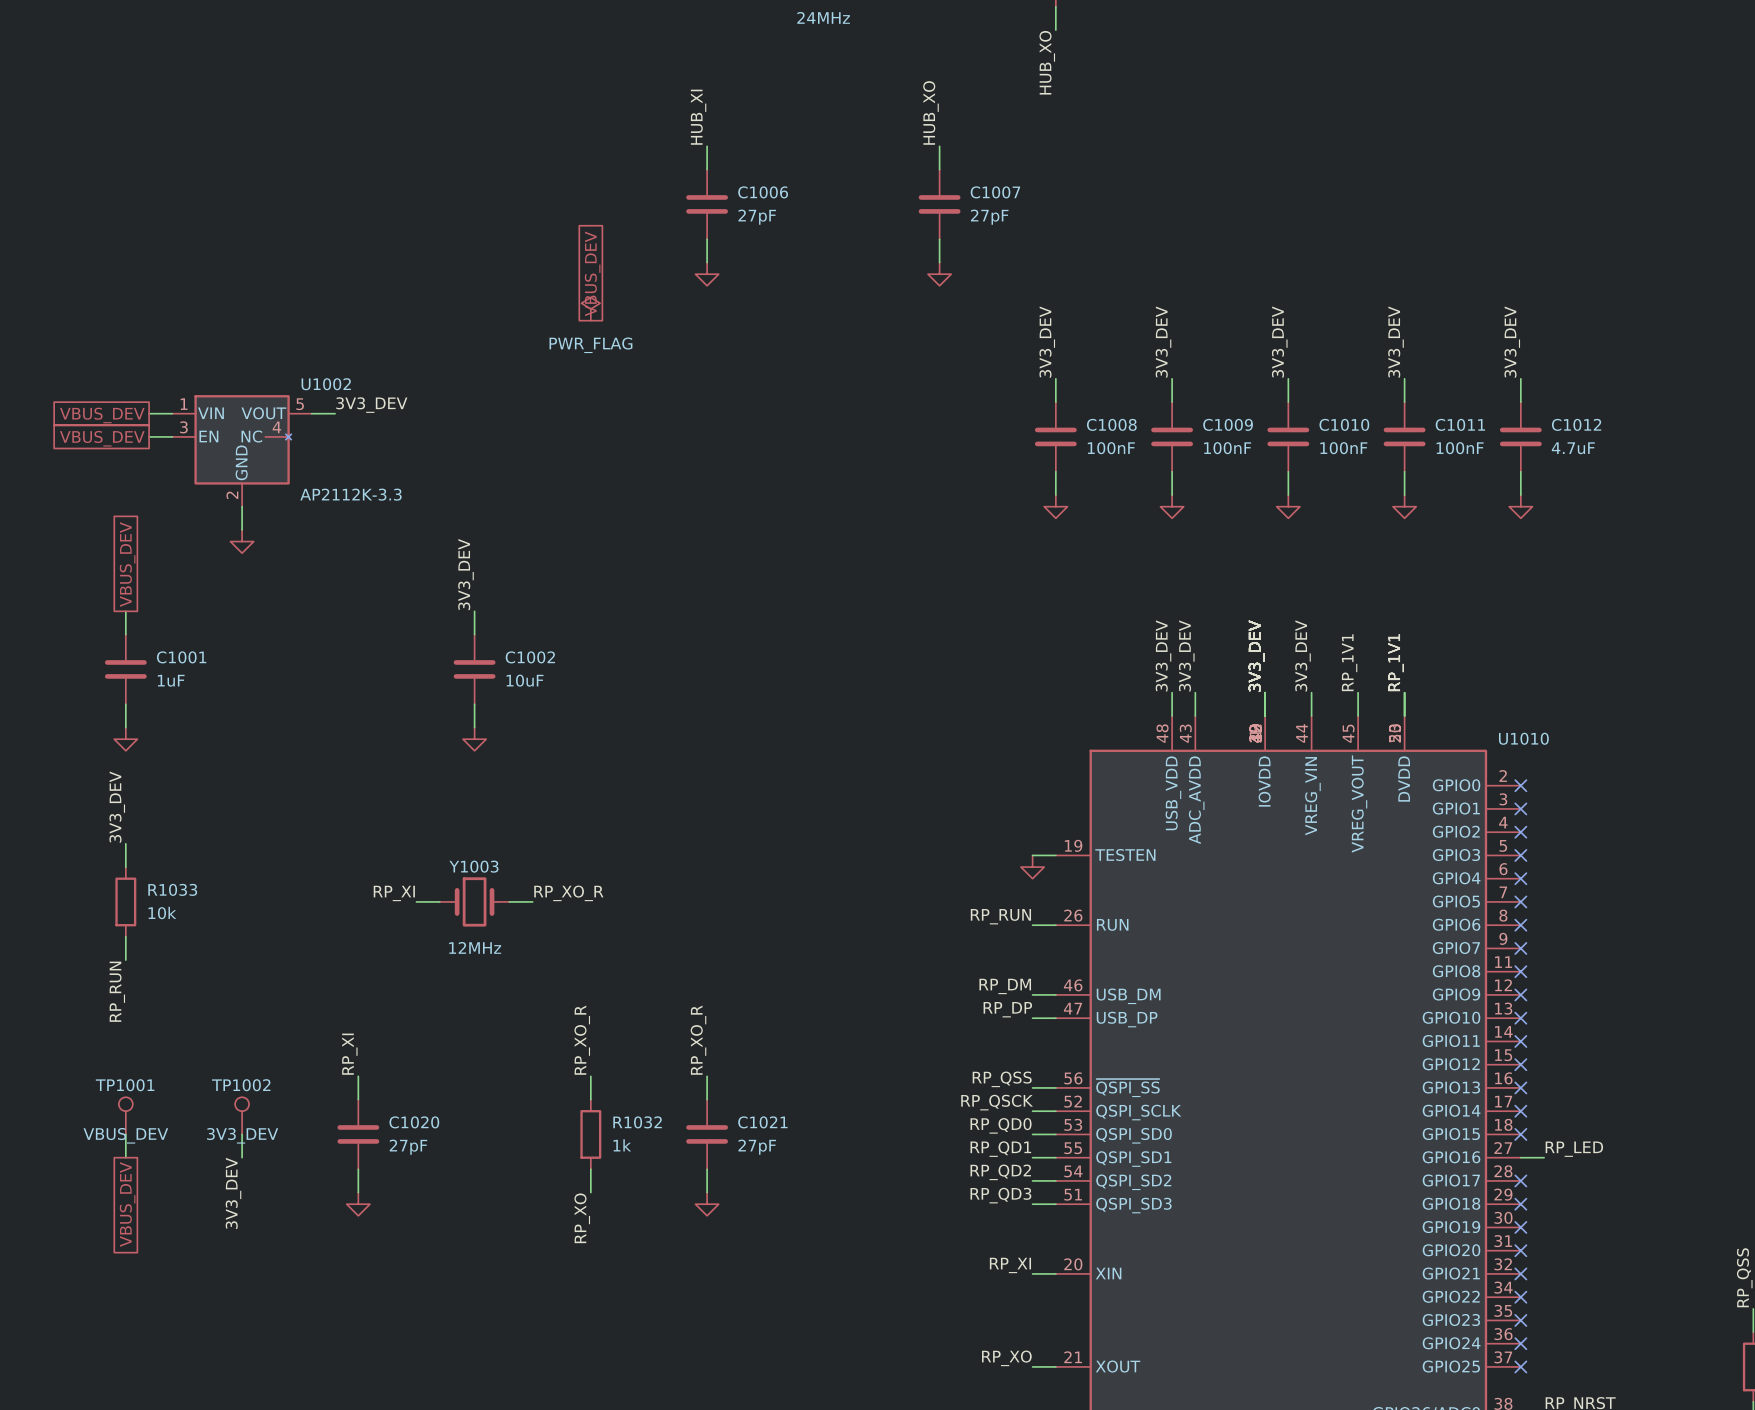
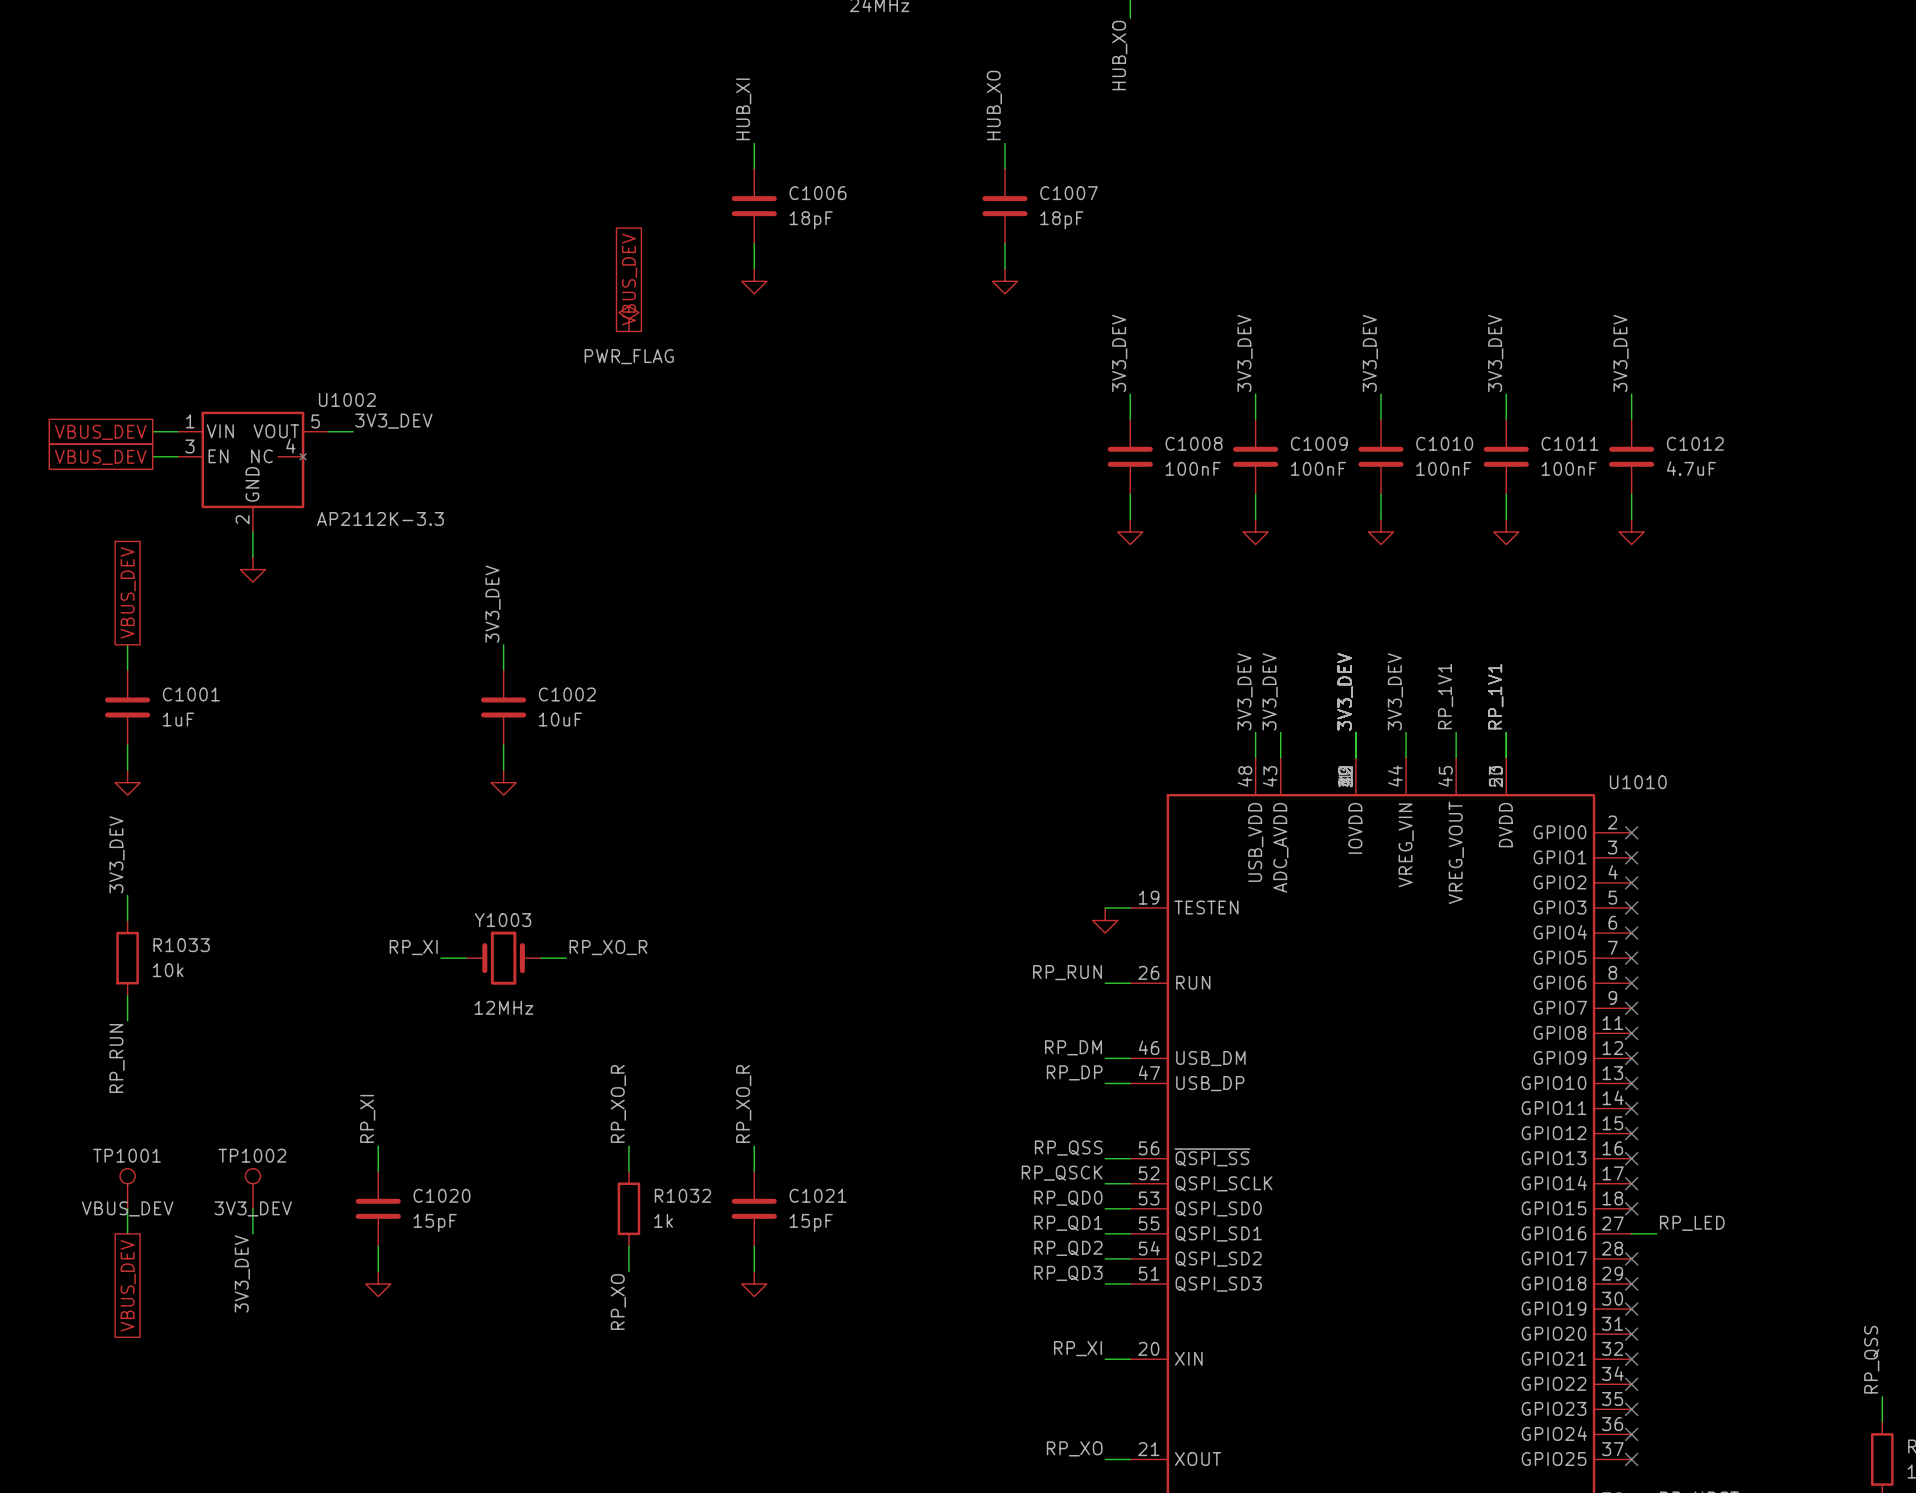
C1006 value: 27pF (757, 217) -> 18pF (811, 220)
C1007 value: 27pF (989, 217) -> 18pF (1061, 220)
C1020 value: 27pF (408, 1147) -> 15pF (435, 1222)
C1021 value: 27pF (757, 1147) -> 15pF (811, 1222)

